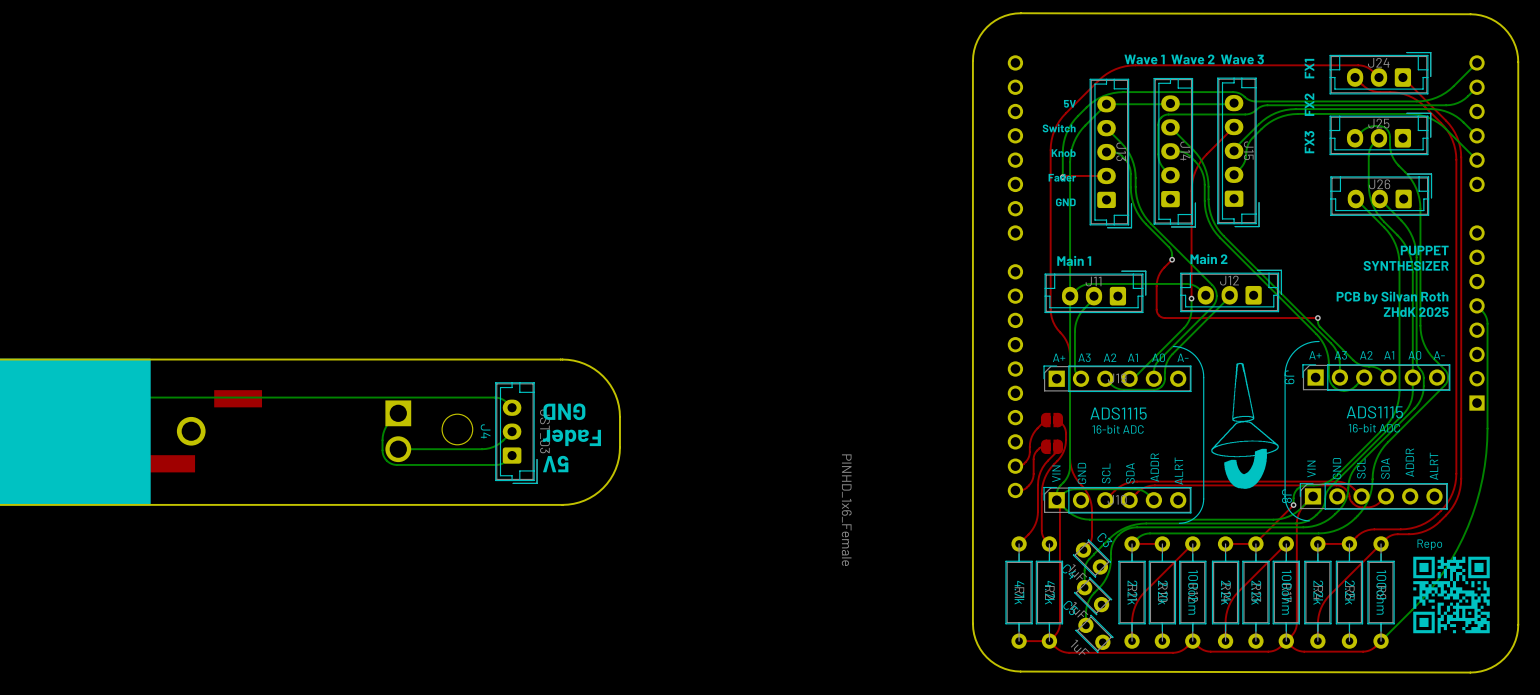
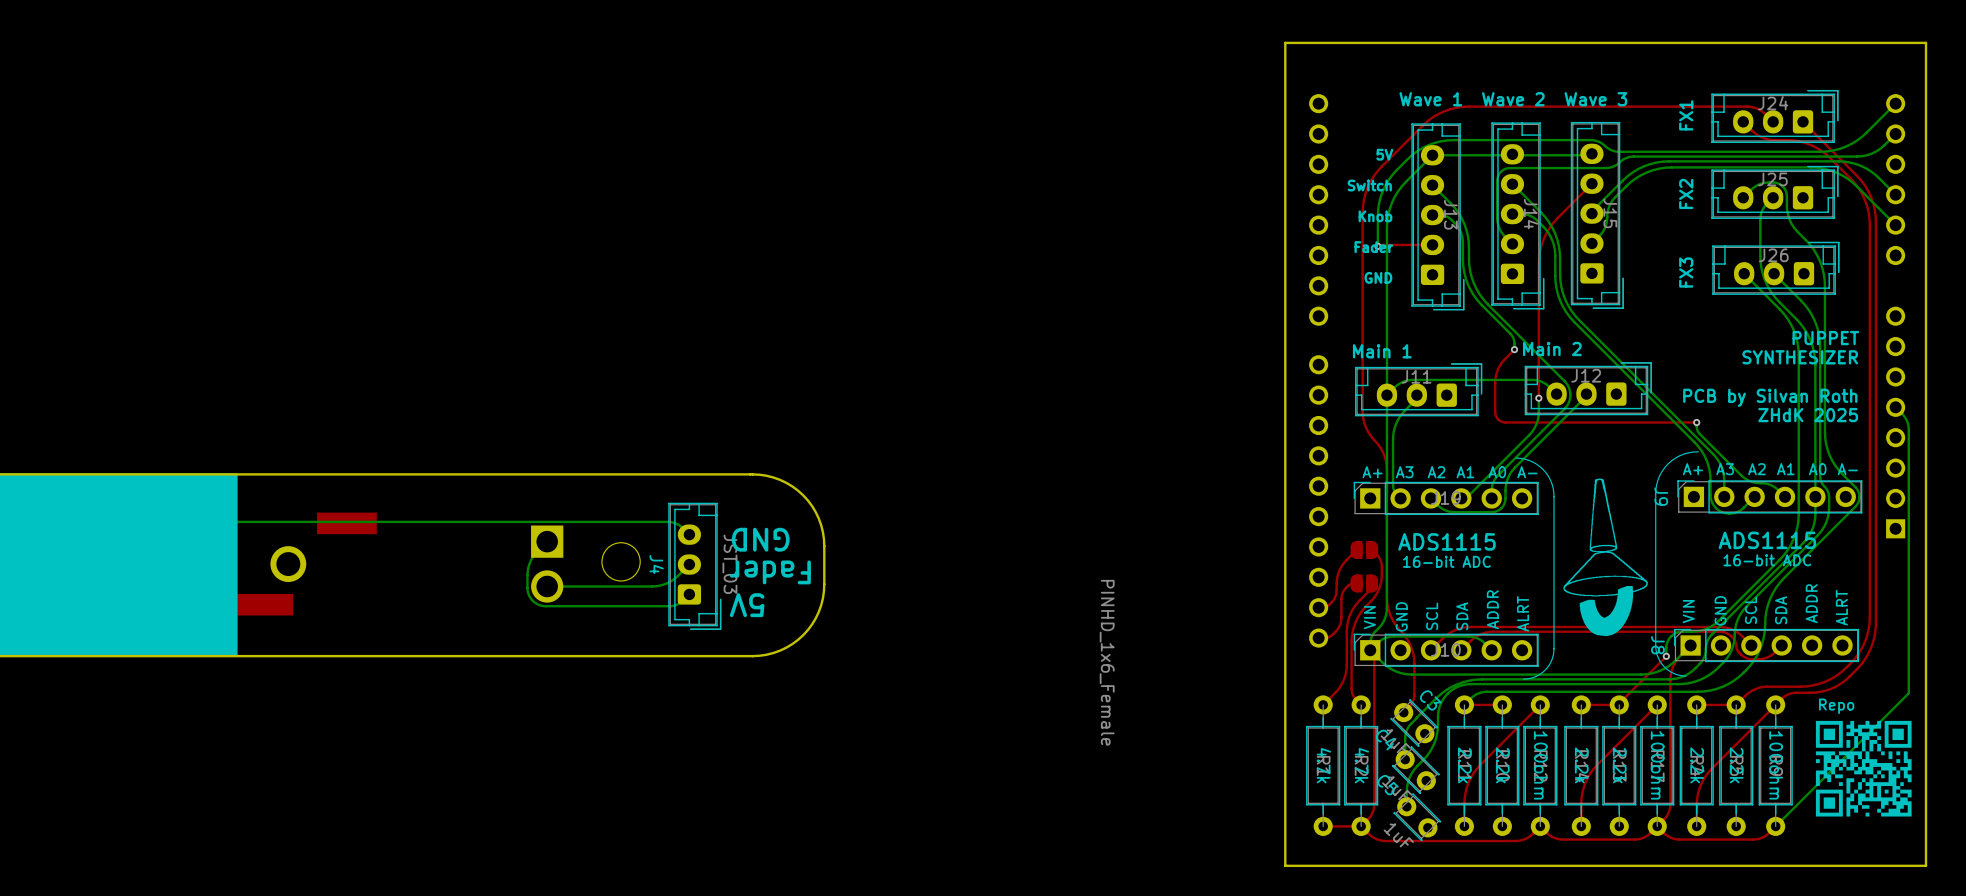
board edge: (1020, 13) (1470, 14) (1491, 19) (1507, 32) (1515, 46) (1518, 62) (1518, 624) (1513, 645) (1500, 662) (1486, 669) (1470, 672) (1020, 671) (999, 666) (983, 653) (975, 639) (972, 623) (973, 55) (980, 35) (990, 23) (1005, 15) (1020, 13) -> (1926, 42) (1926, 865) (1285, 865) (1285, 42) (1926, 42)
bottom track: (1487, 428) (1482, 478) (1468, 526) (1444, 570) (1412, 609) -> (1908, 560) (1908, 693) (1815, 787)

